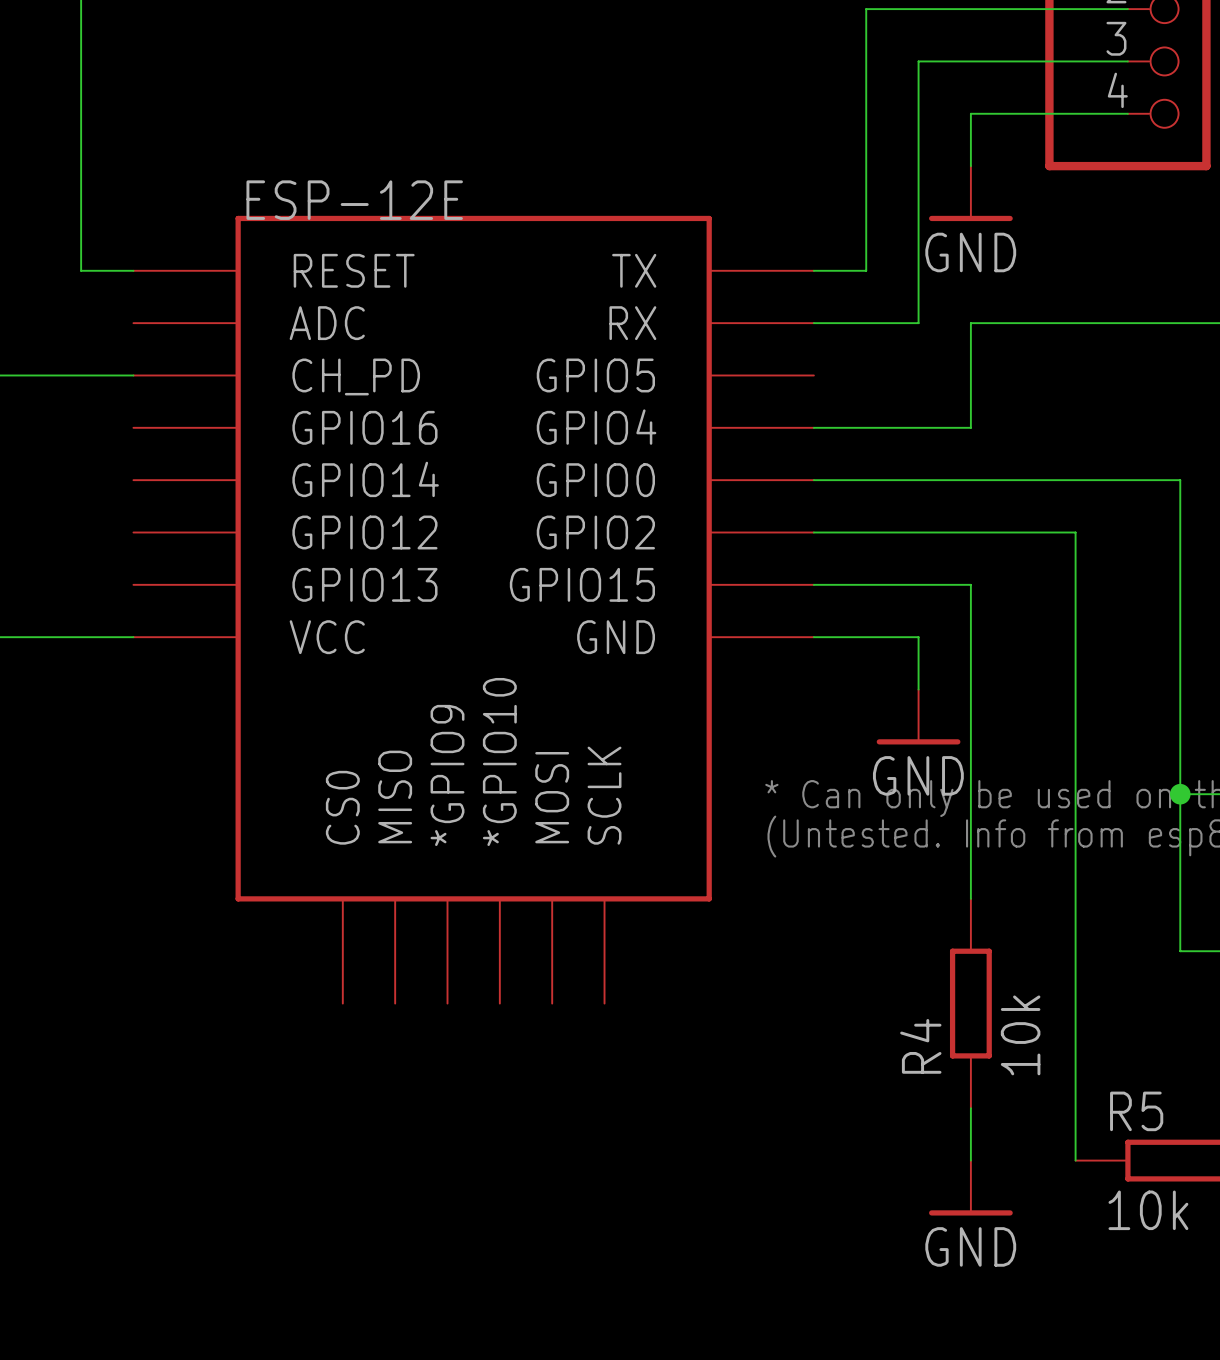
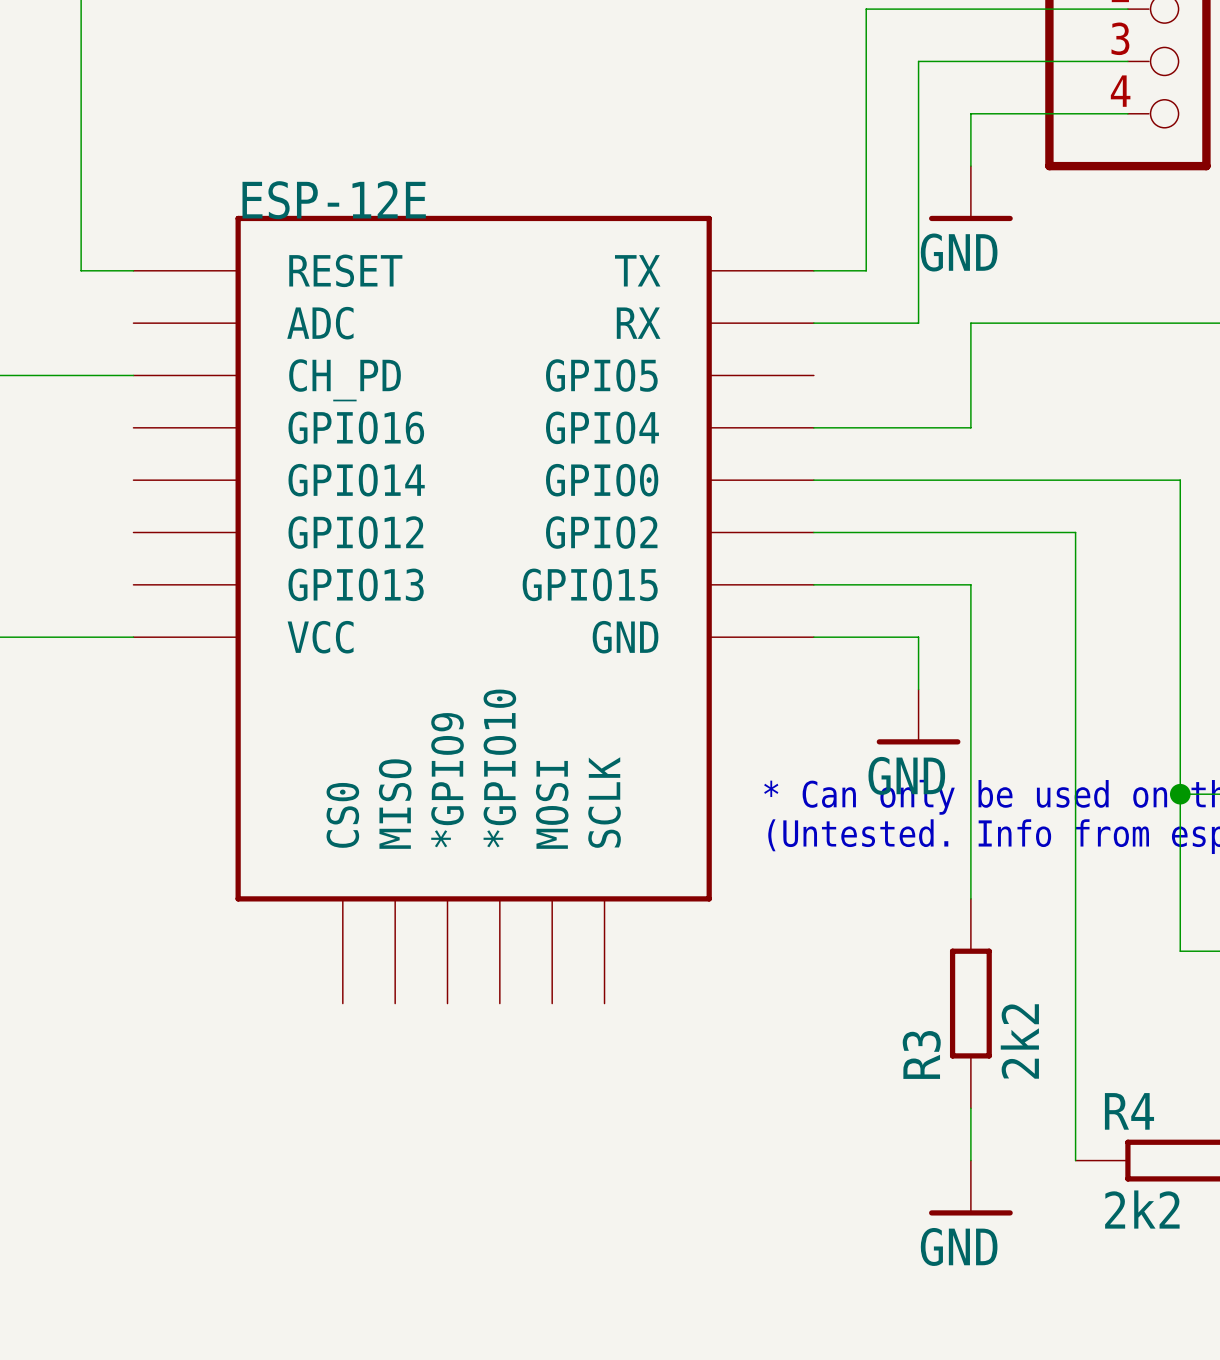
R4 value: 10k (1020, 1035) -> 2k2 (1019, 1041)
R4 name: R4 (920, 1046) -> R3 (921, 1054)
R5 name: R5 (1136, 1111) -> R4 (1129, 1111)
R5 value: 10k (1148, 1210) -> 2k2 (1142, 1209)

